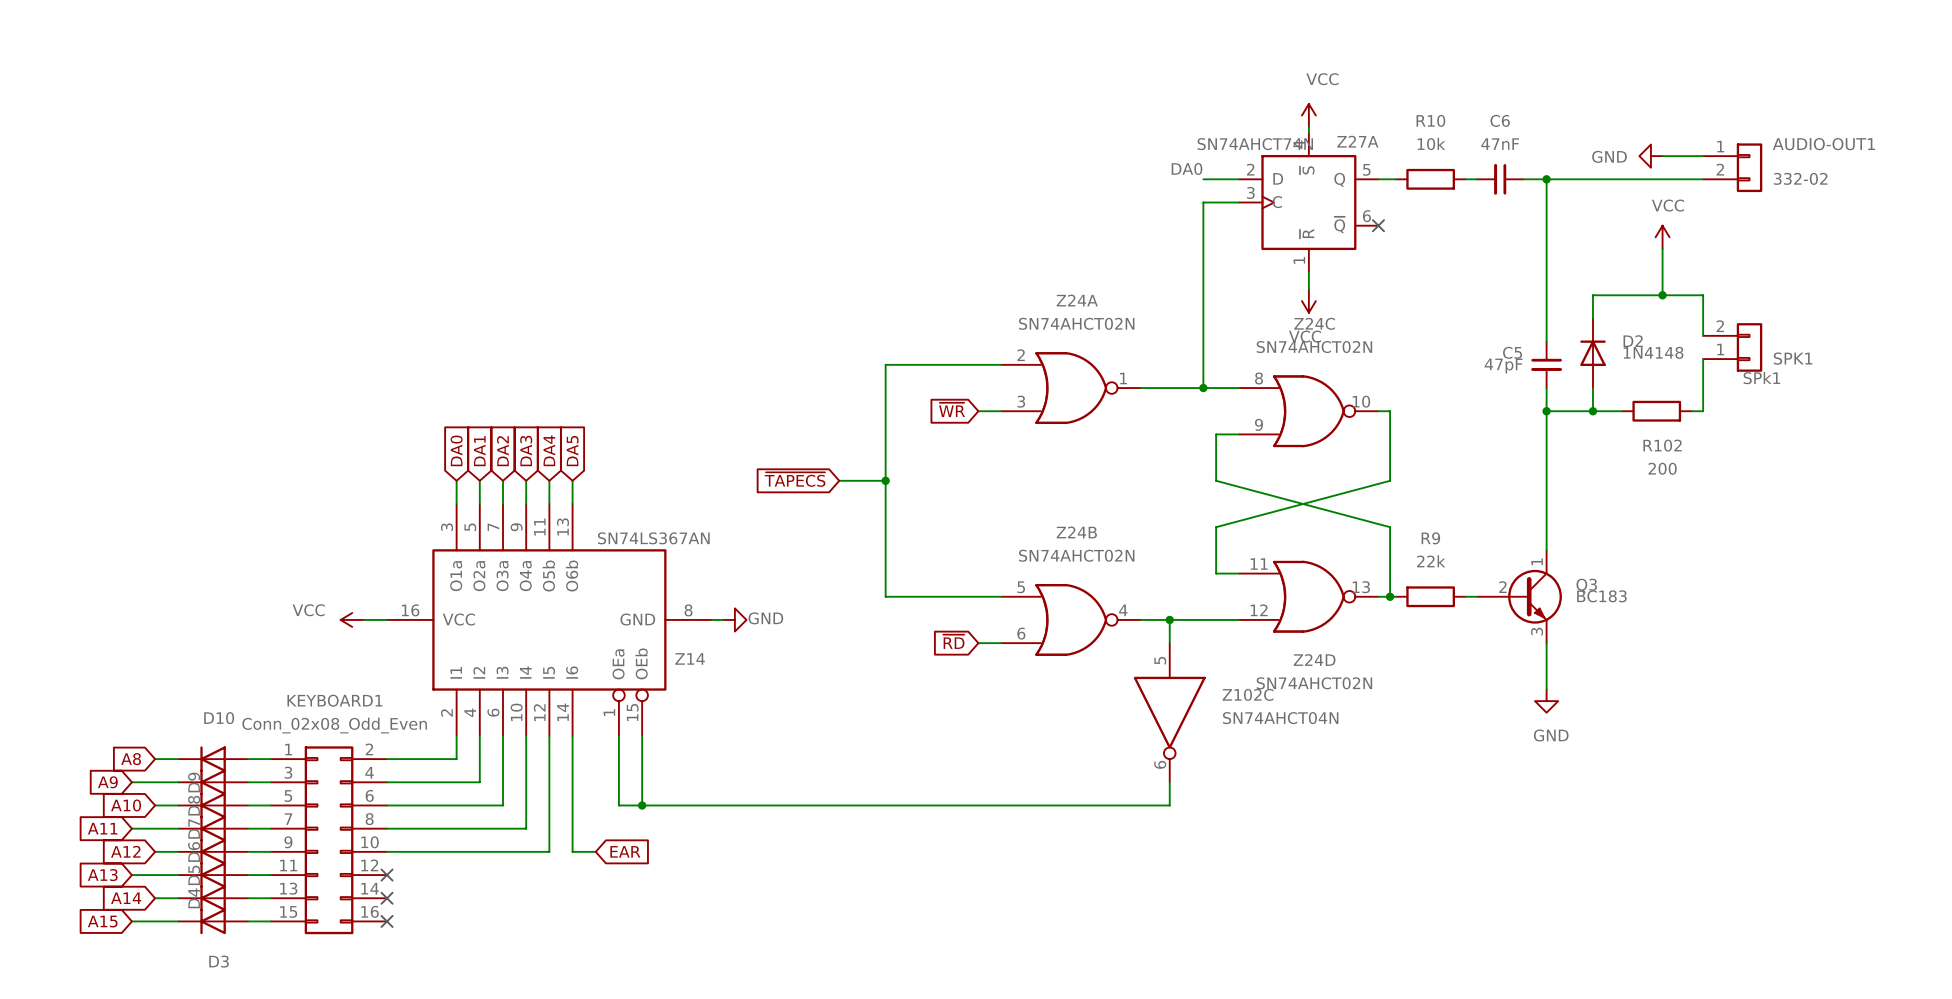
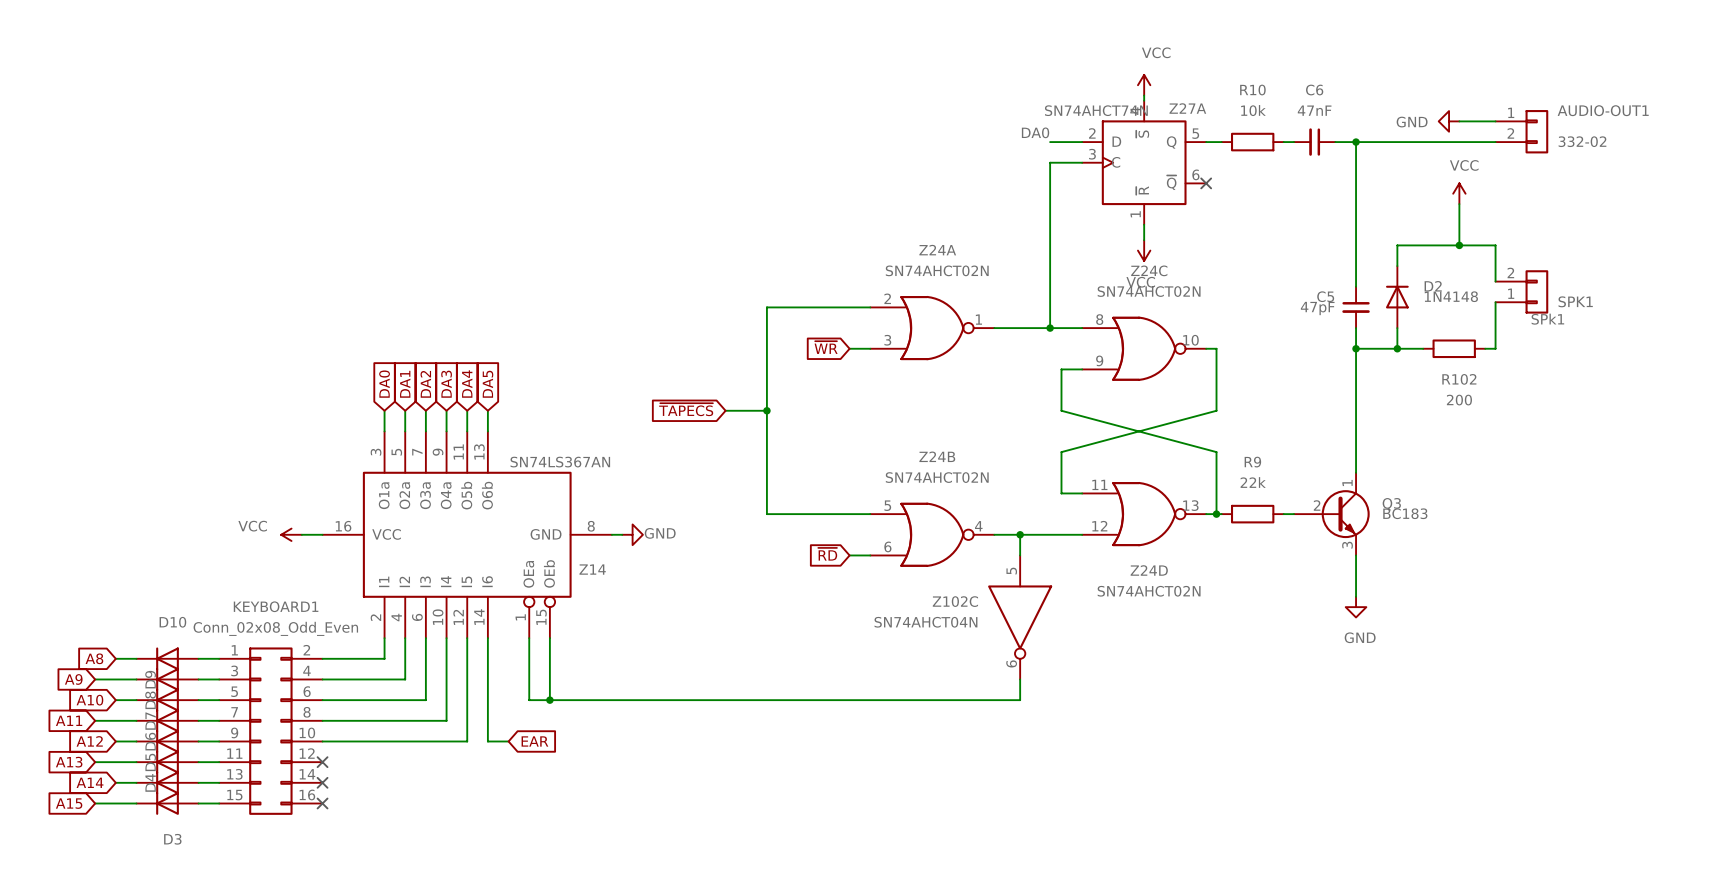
Z102C name position: Z102C (1248, 694) -> Z102C (955, 601)
Z102C value position: SN74AHCT04N (1280, 718) -> SN74AHCT04N (925, 622)

